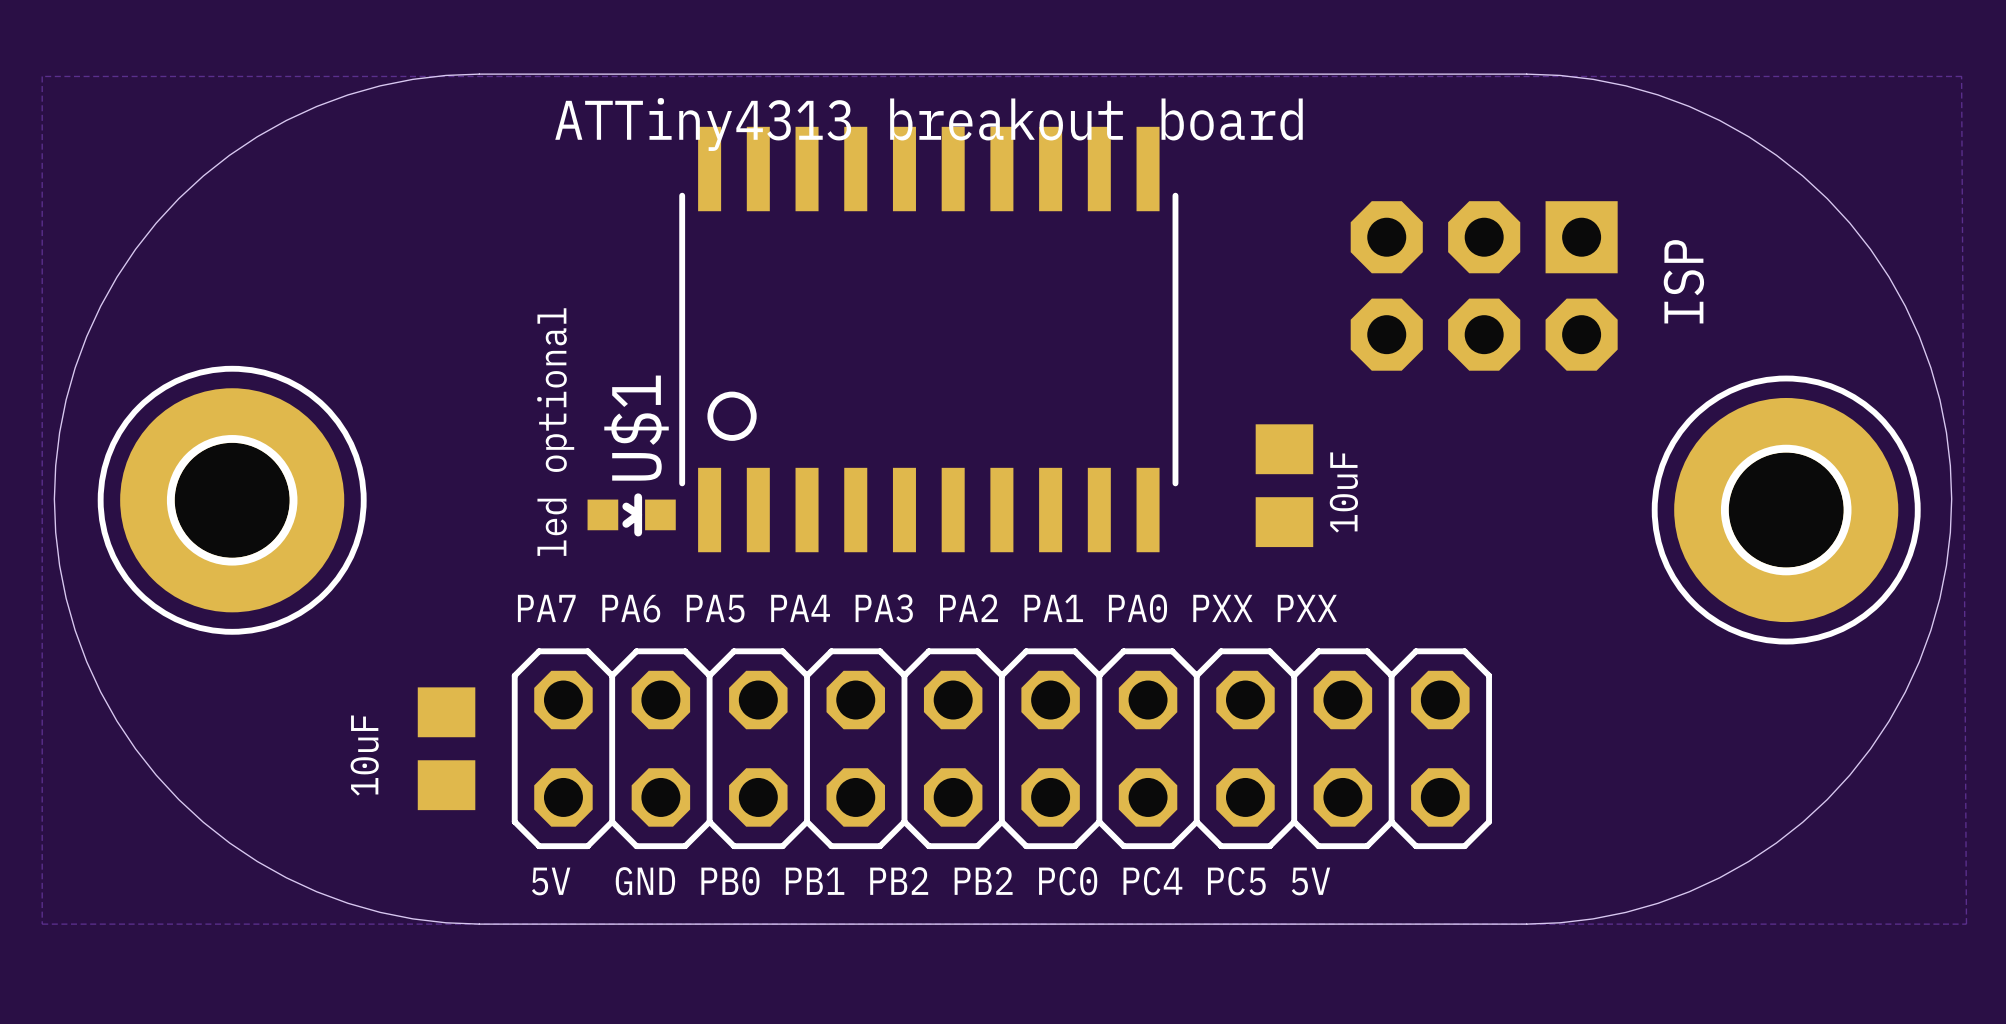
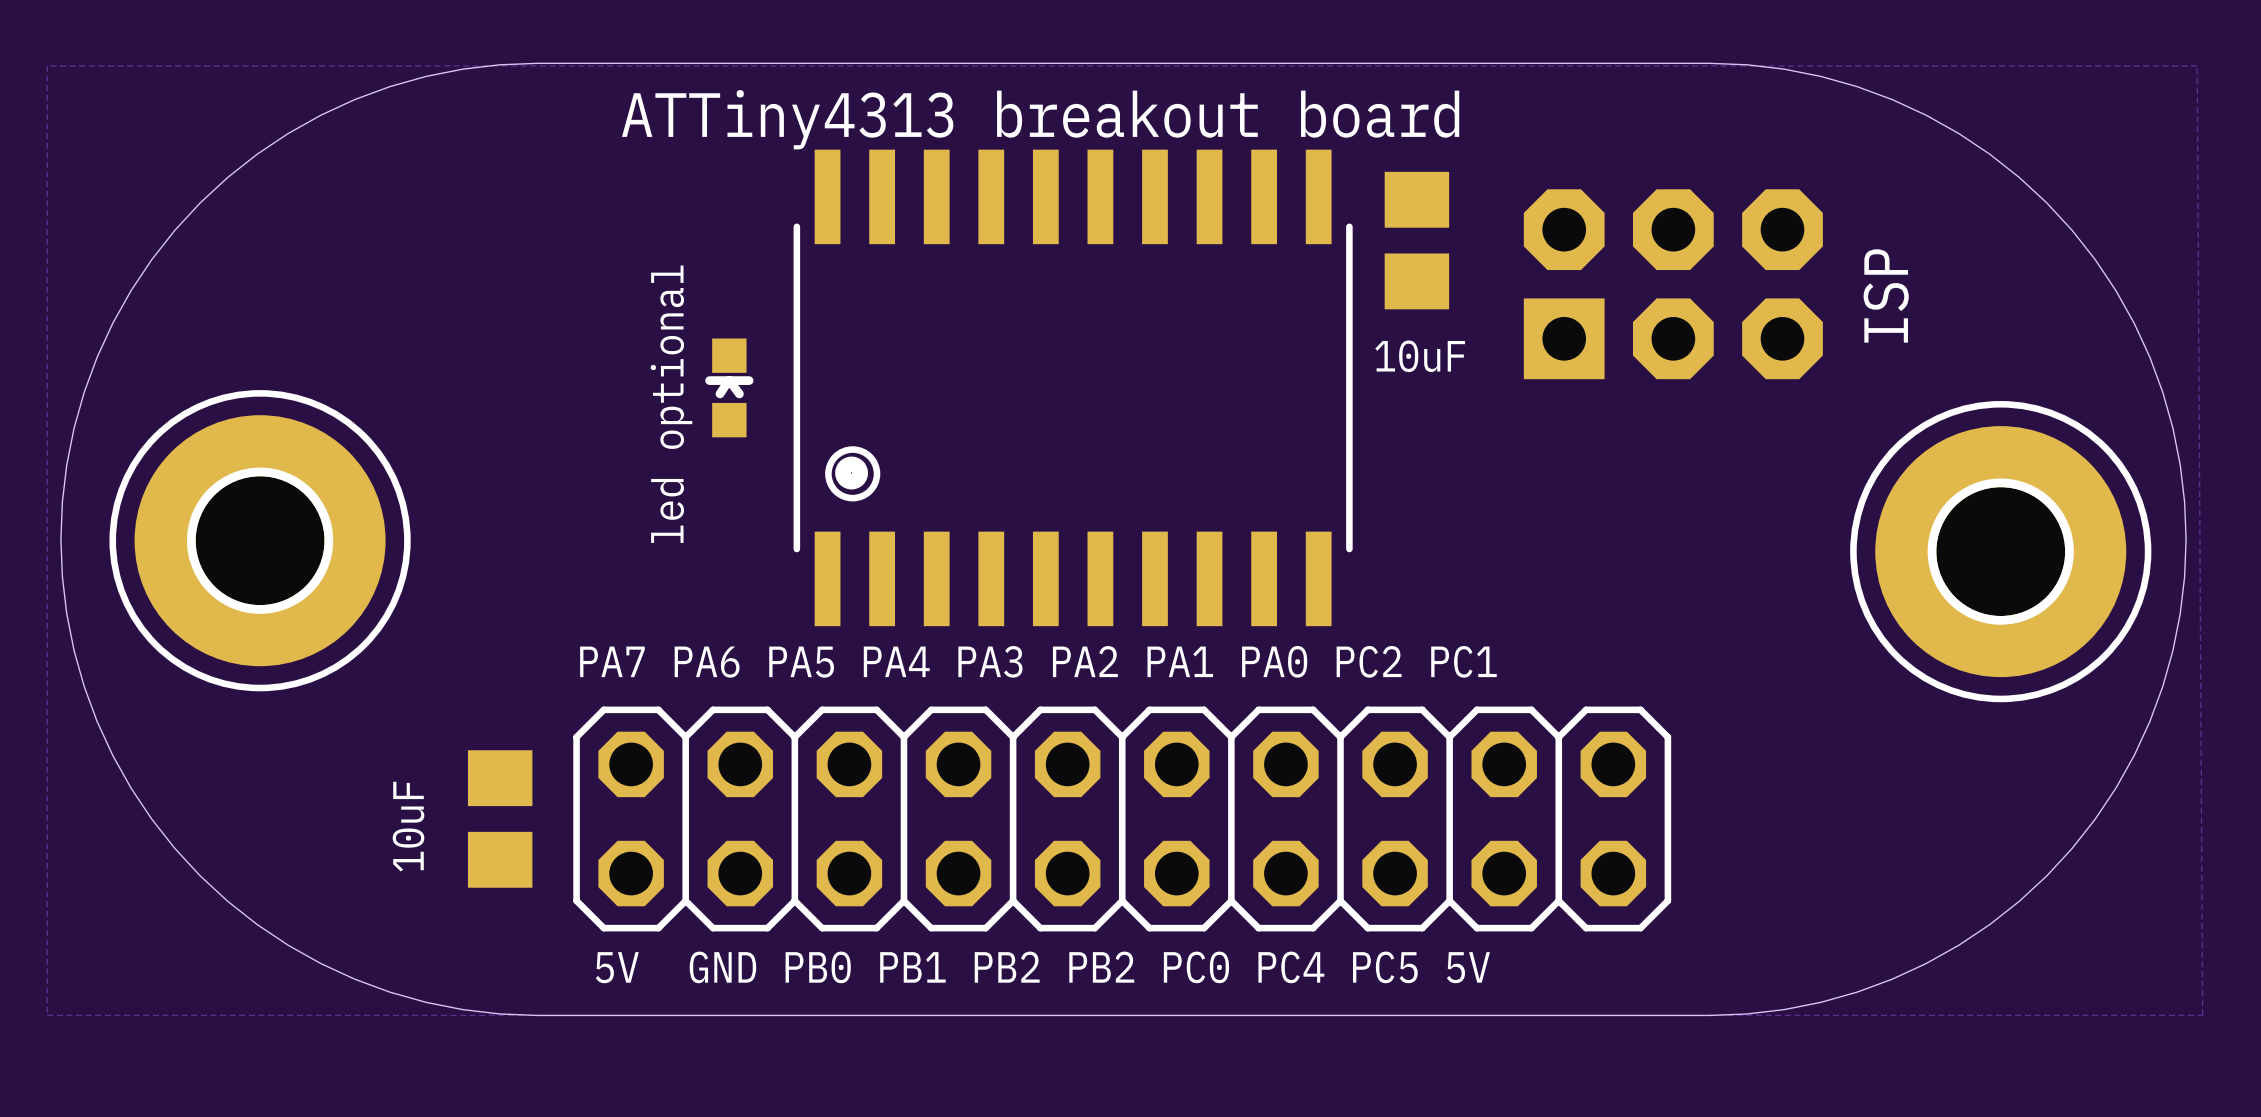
part rotation: 0° (1484, 285) -> 180° (1673, 284)
U$1 position: (928, 339) -> (1073, 387)
drawing: none -> [835, 456, 869, 490]
U$1 name: U$1 (636, 428) -> none
text position: led optional (555, 432) -> led optional (671, 404)
part position: (1284, 485) -> (1416, 240)
text rotation: 0° (1343, 492) -> 90° clockwise (1420, 356)
text position: 10uF (1343, 492) -> 10uF (1420, 356)
part rotation: 0° (631, 514) -> 90° counterclockwise (729, 387)
part position: (631, 514) -> (729, 387)
text: PA7 PA6 PA5 PA4 PA3 PA2 PA1 PA0 PXX PXX (927, 608) -> PA7 PA6 PA5 PA4 PA3 PA2 PA1 PA0 PC2 PC1 (1038, 661)

